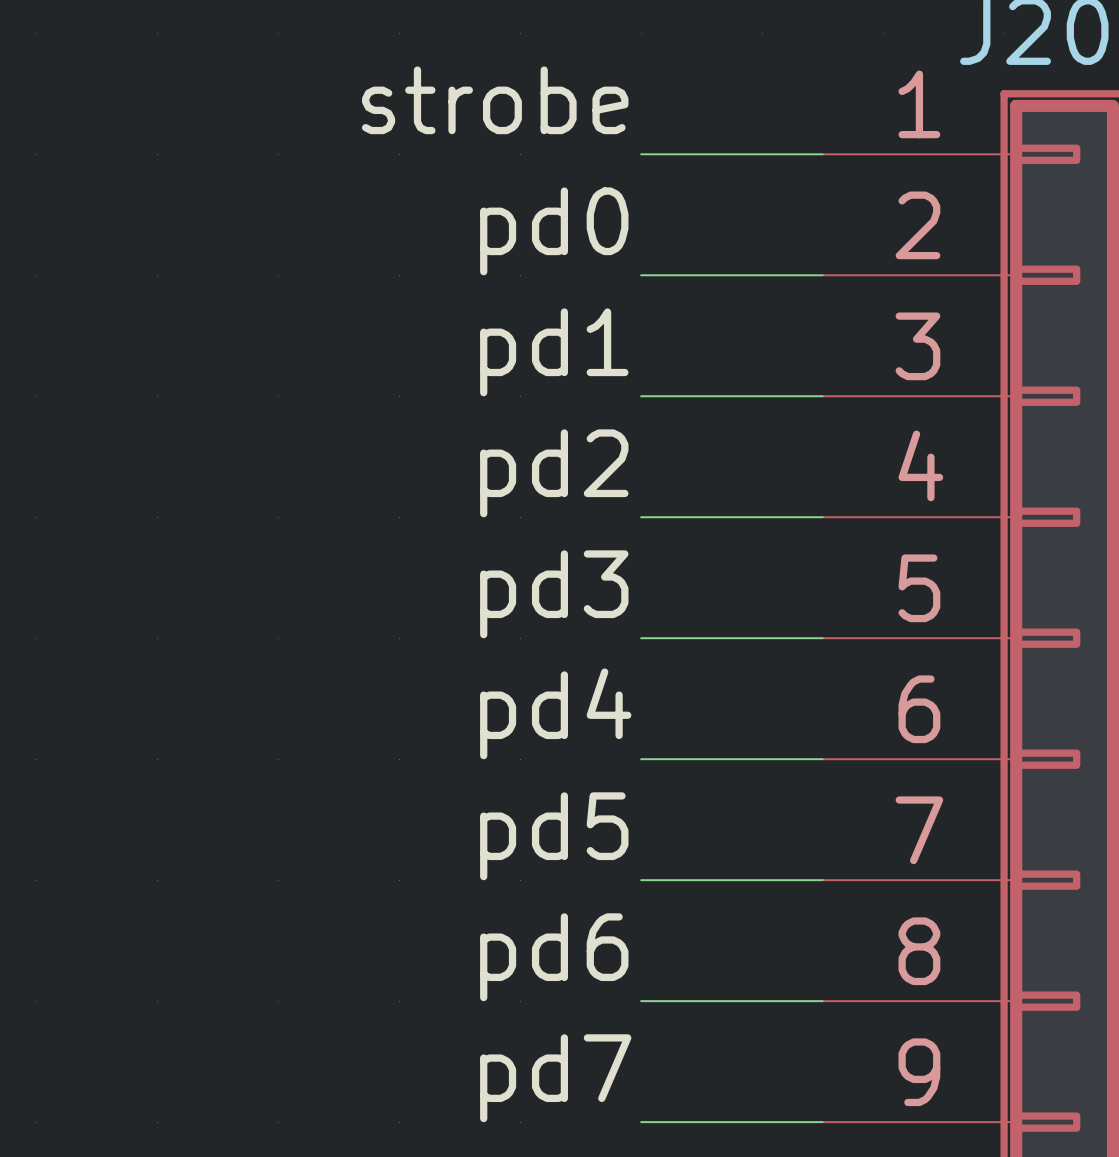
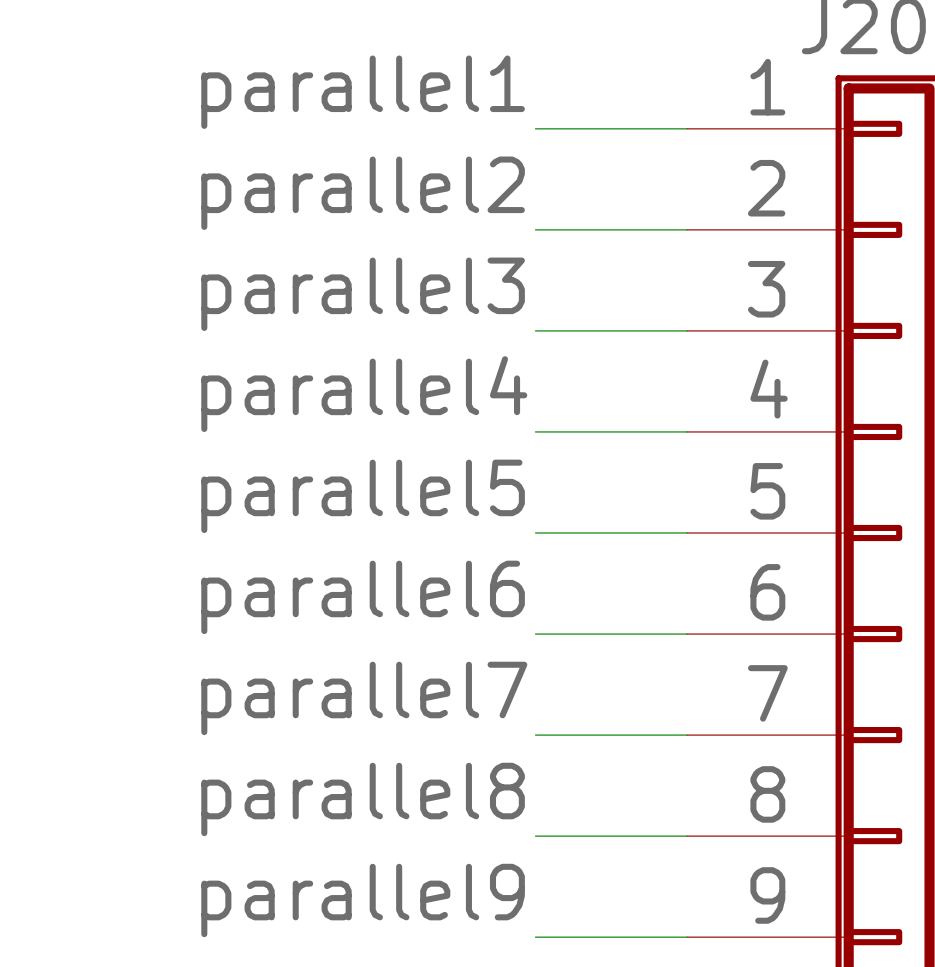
label: strobe (495, 100) -> parallel1 (363, 92)
label: pd0 (554, 231) -> parallel2 (363, 193)
label: pd1 (554, 352) -> parallel3 (363, 294)
label: pd2 (554, 473) -> parallel4 (364, 394)
label: pd3 (554, 594) -> parallel5 (363, 496)
label: pd4 (555, 713) -> parallel6 (363, 597)
label: pd5 (554, 836) -> parallel7 (364, 698)
label: pd6 (554, 957) -> parallel8 (363, 799)
label: pd7 (555, 1078) -> parallel9 (363, 900)

